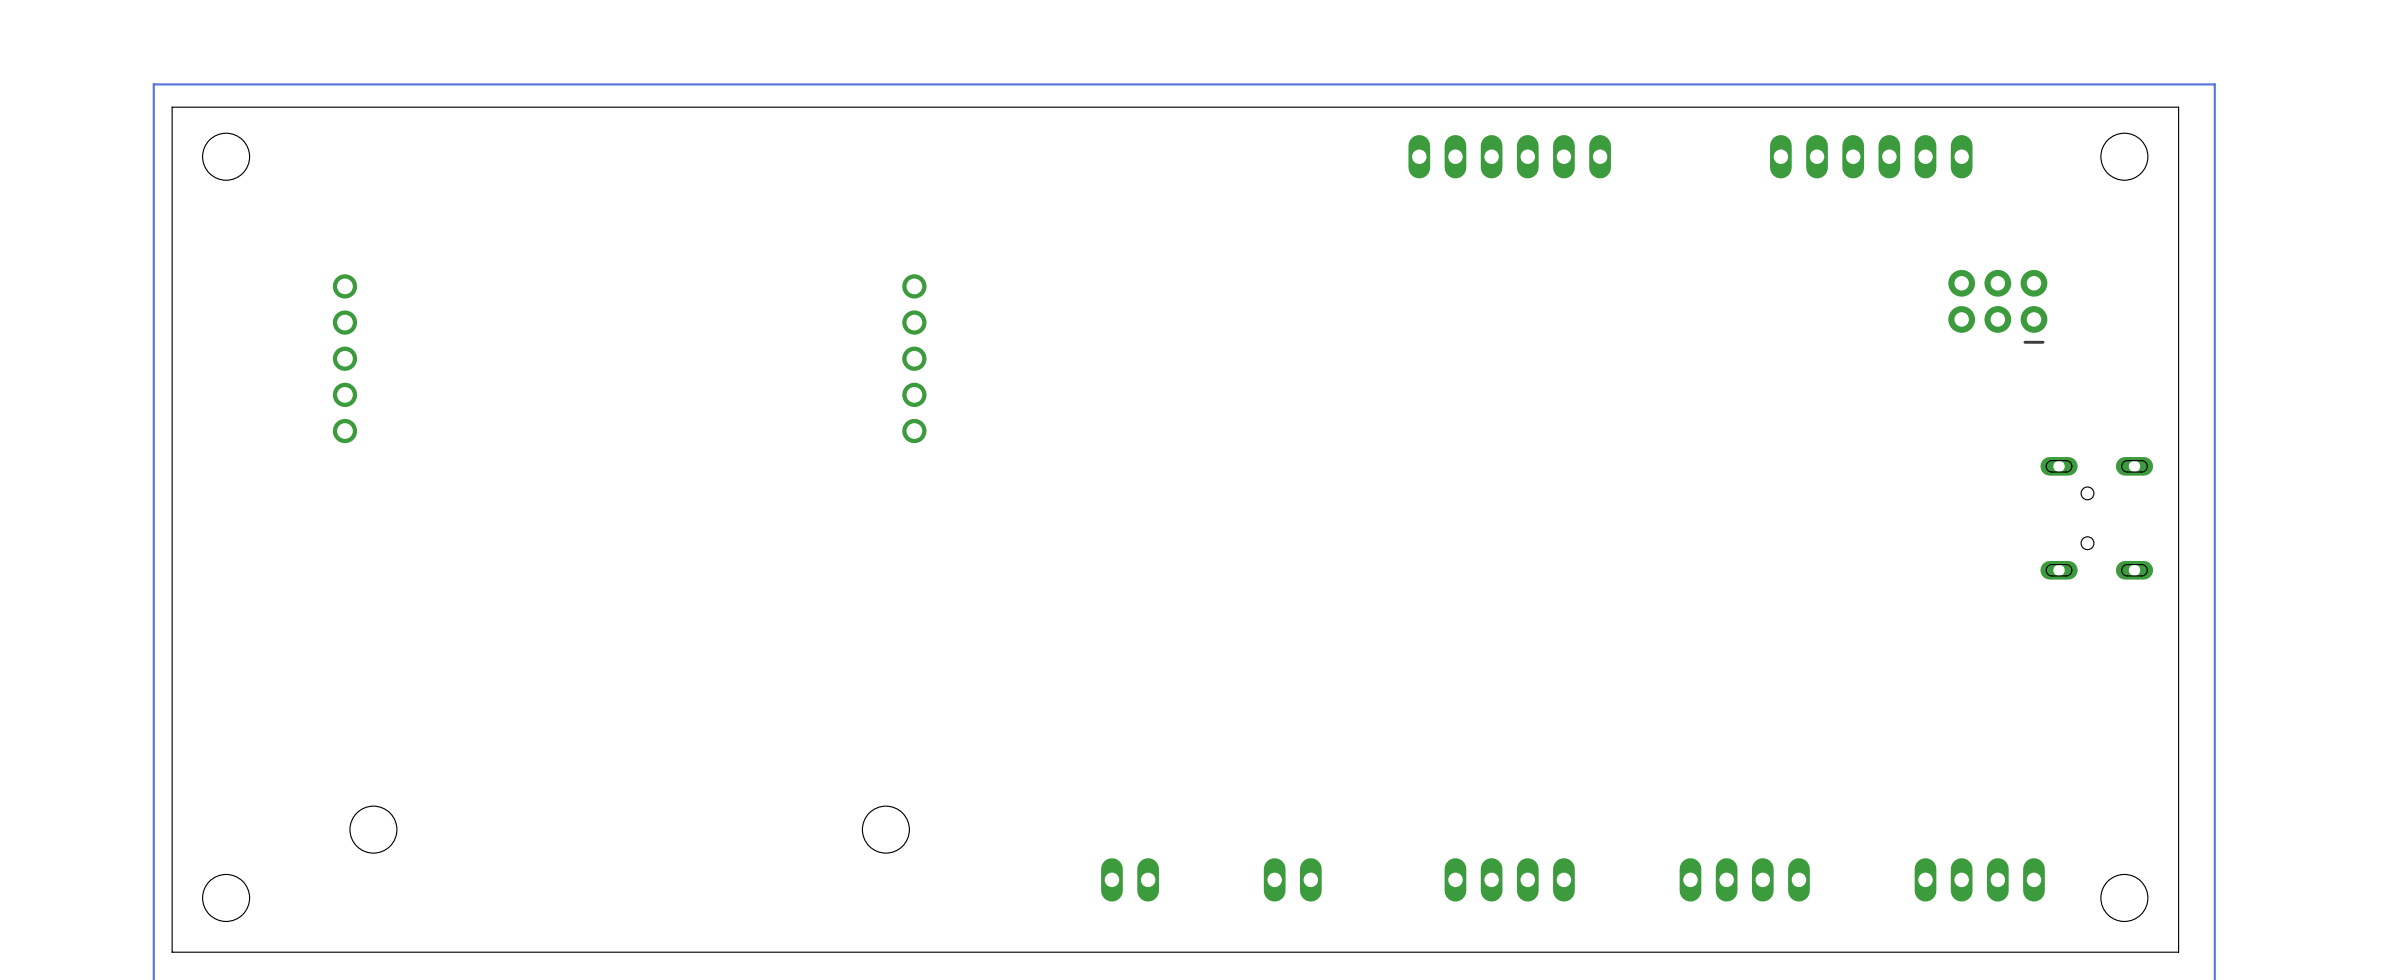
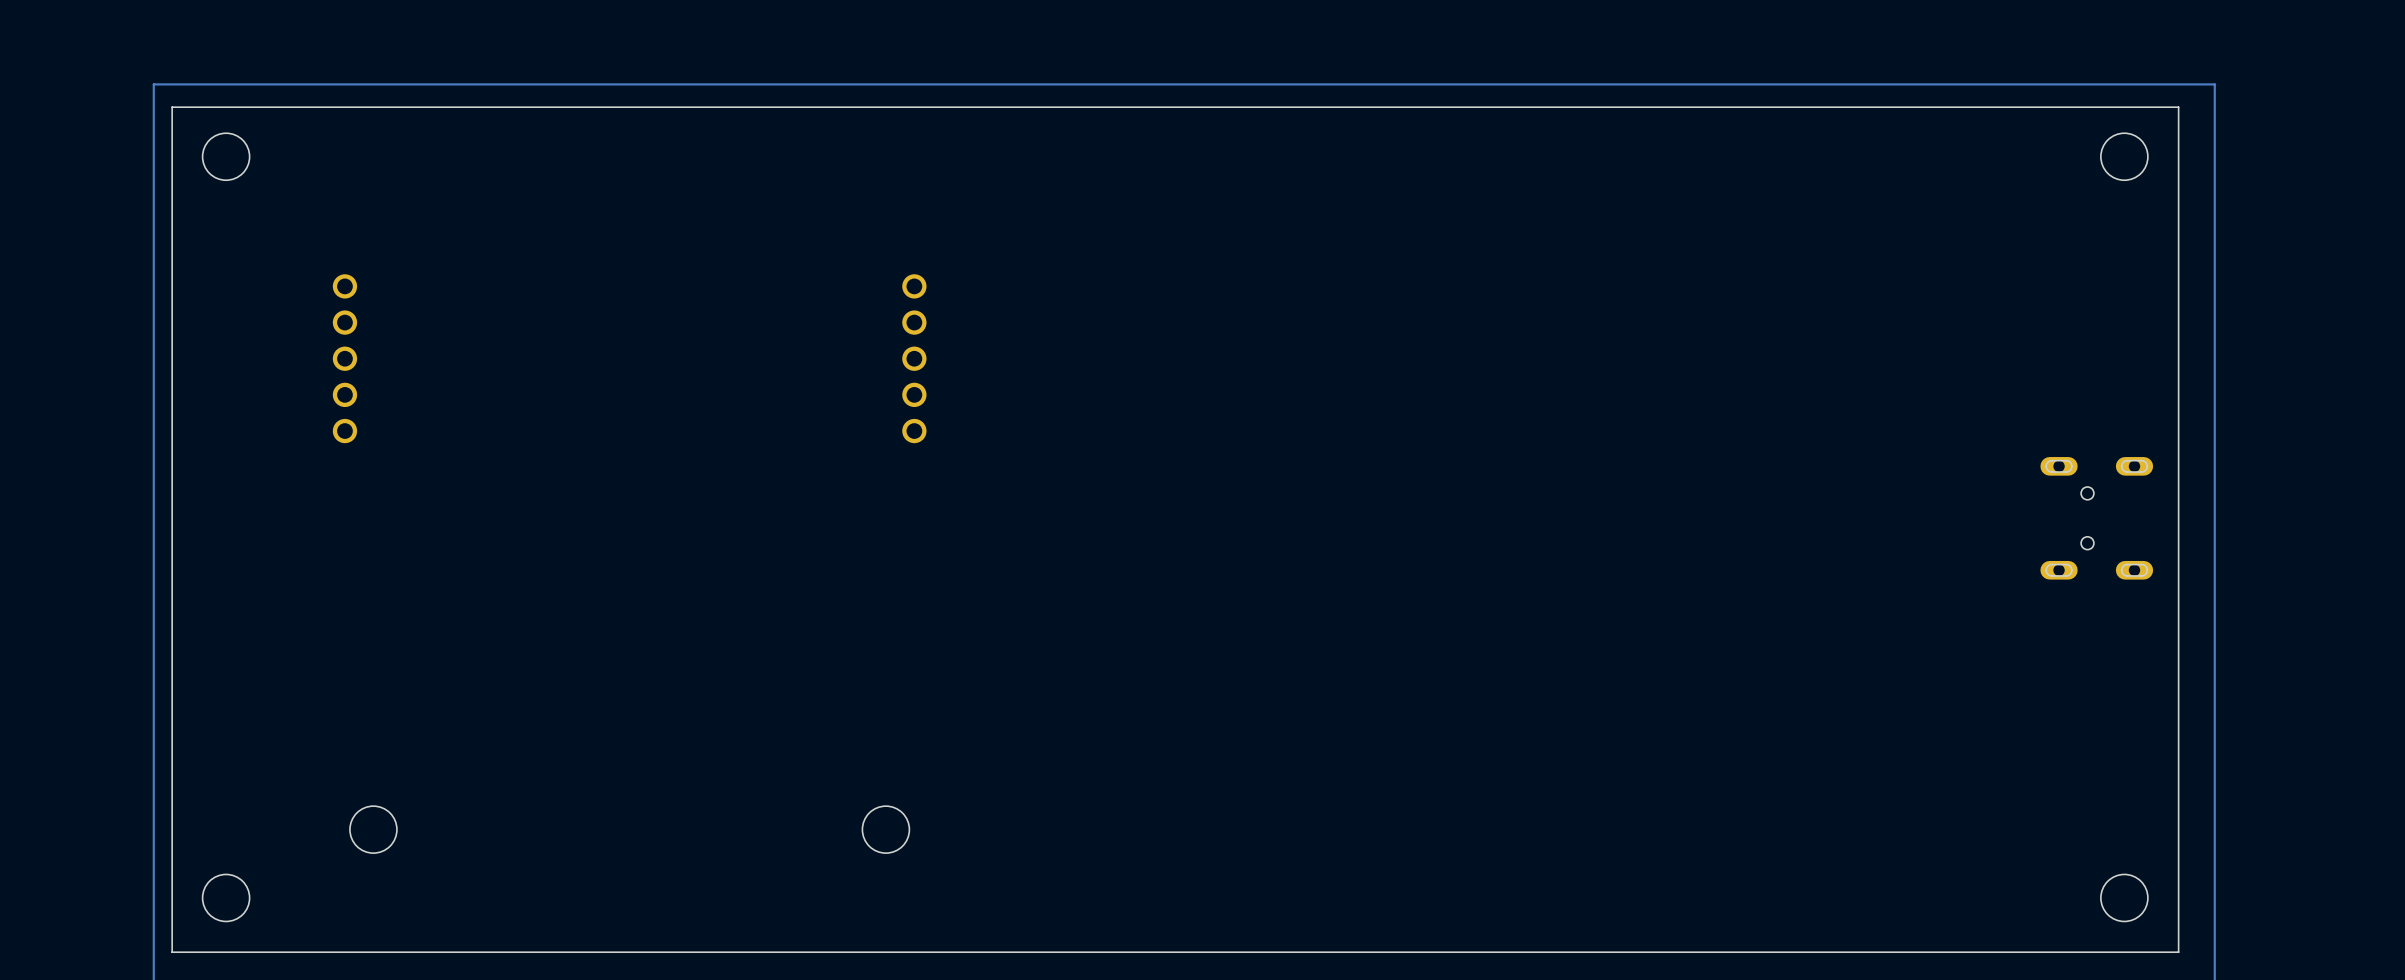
part: (1509, 156) -> none
part: (1871, 156) -> none
part: (1997, 306) -> none
part: (1130, 879) -> none
part: (1292, 879) -> none
part: (1509, 879) -> none
part: (1744, 879) -> none
part: (1979, 879) -> none

